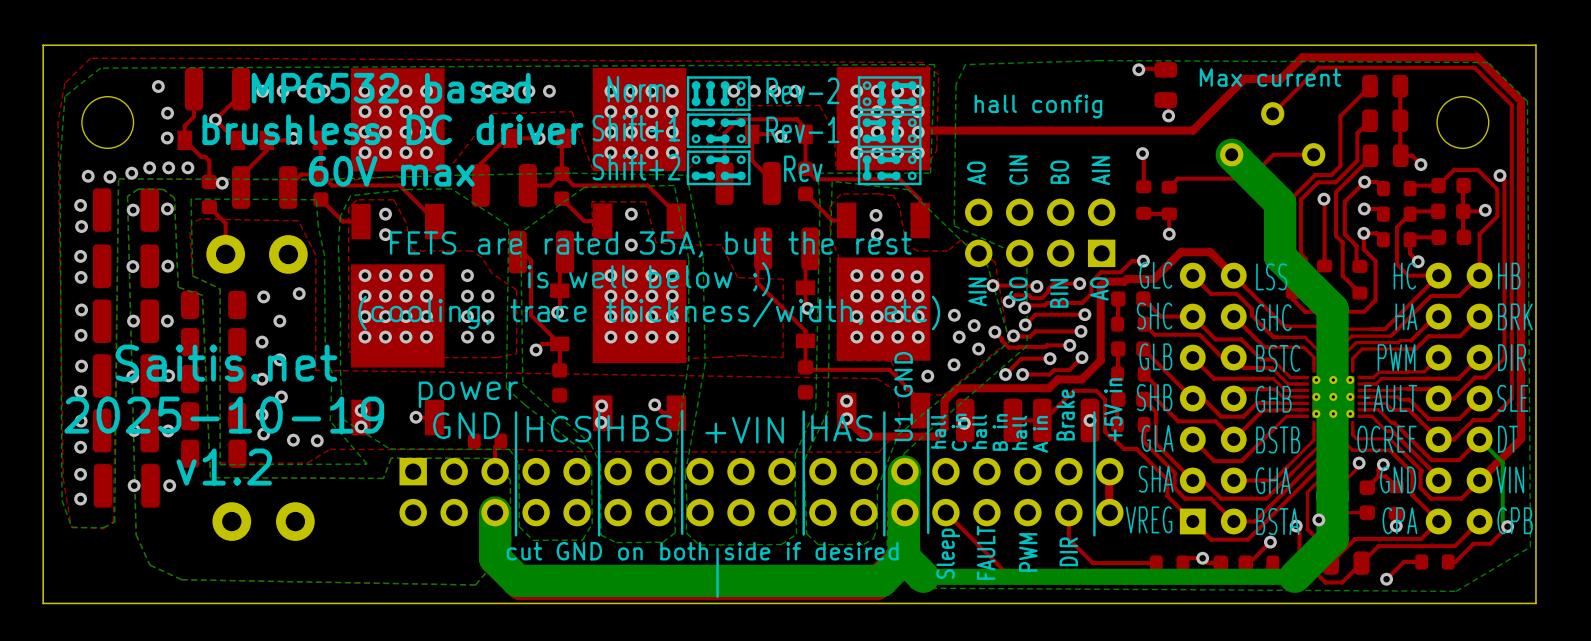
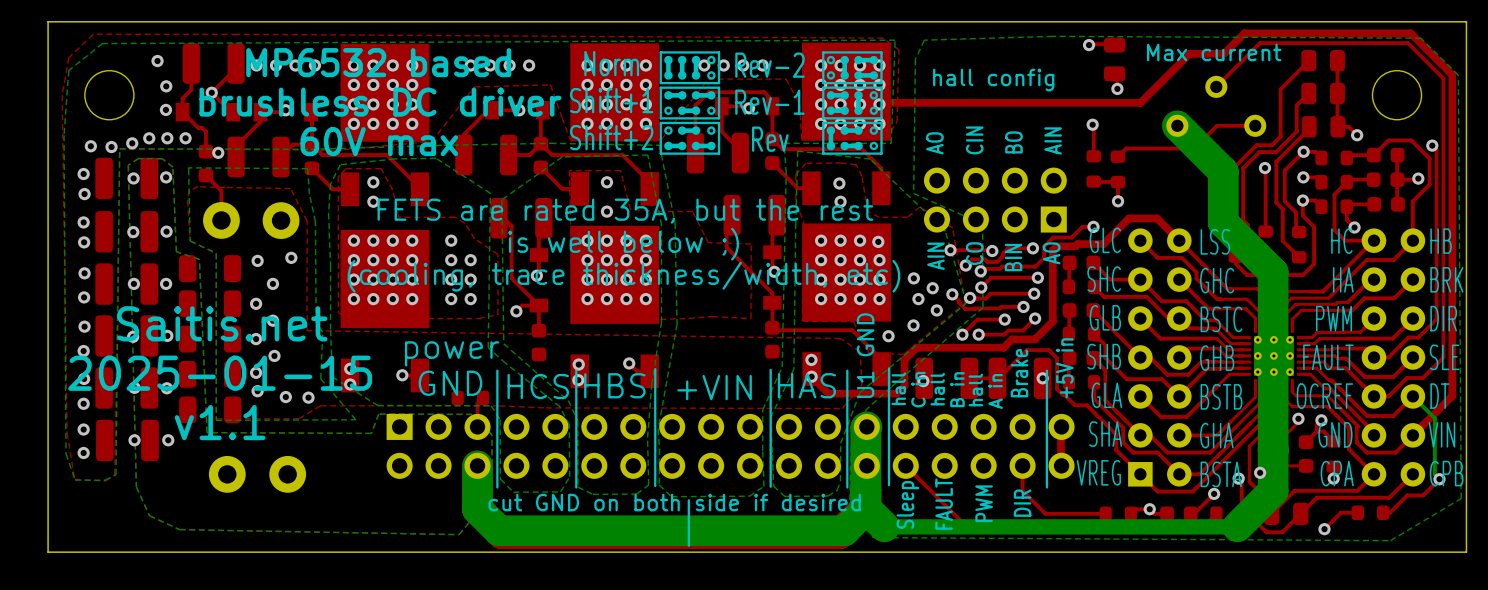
text: 2025-10-19 (224, 415) -> 2025-01-15 (220, 373)
text: v1.2 (224, 467) -> v1.1 (220, 422)

